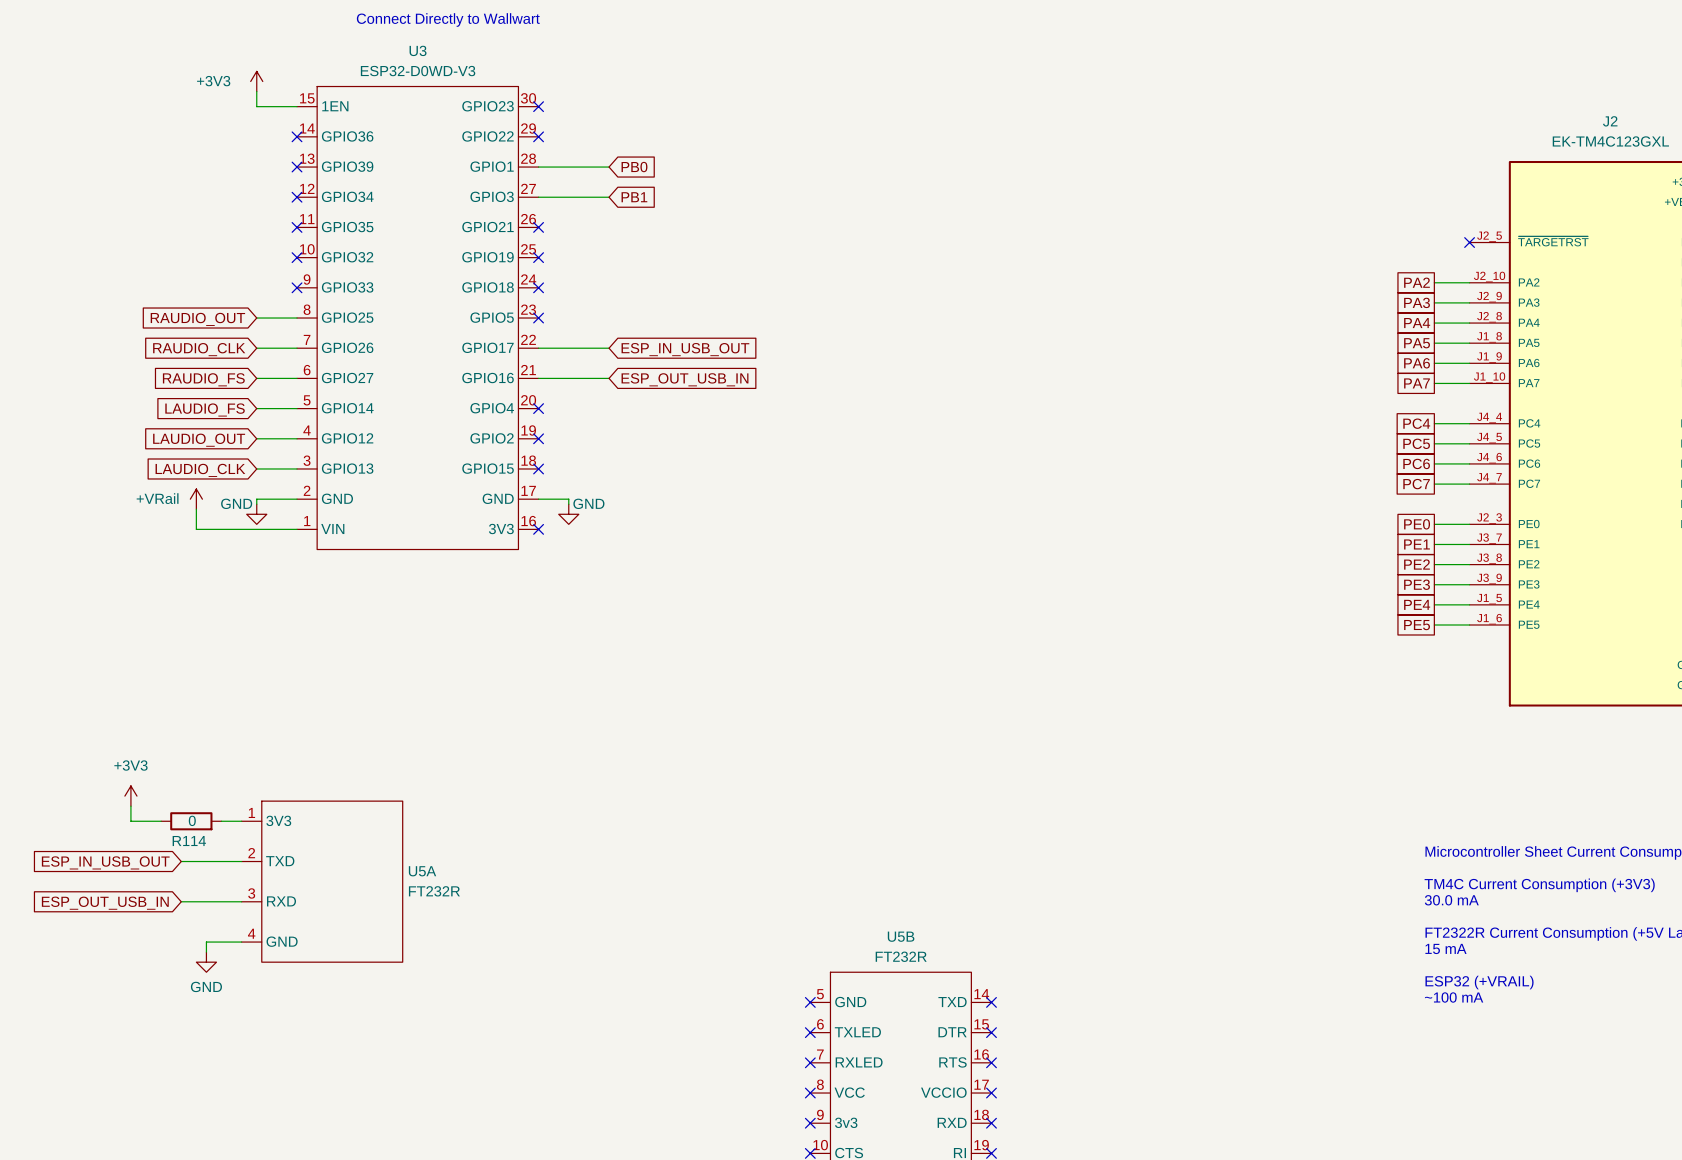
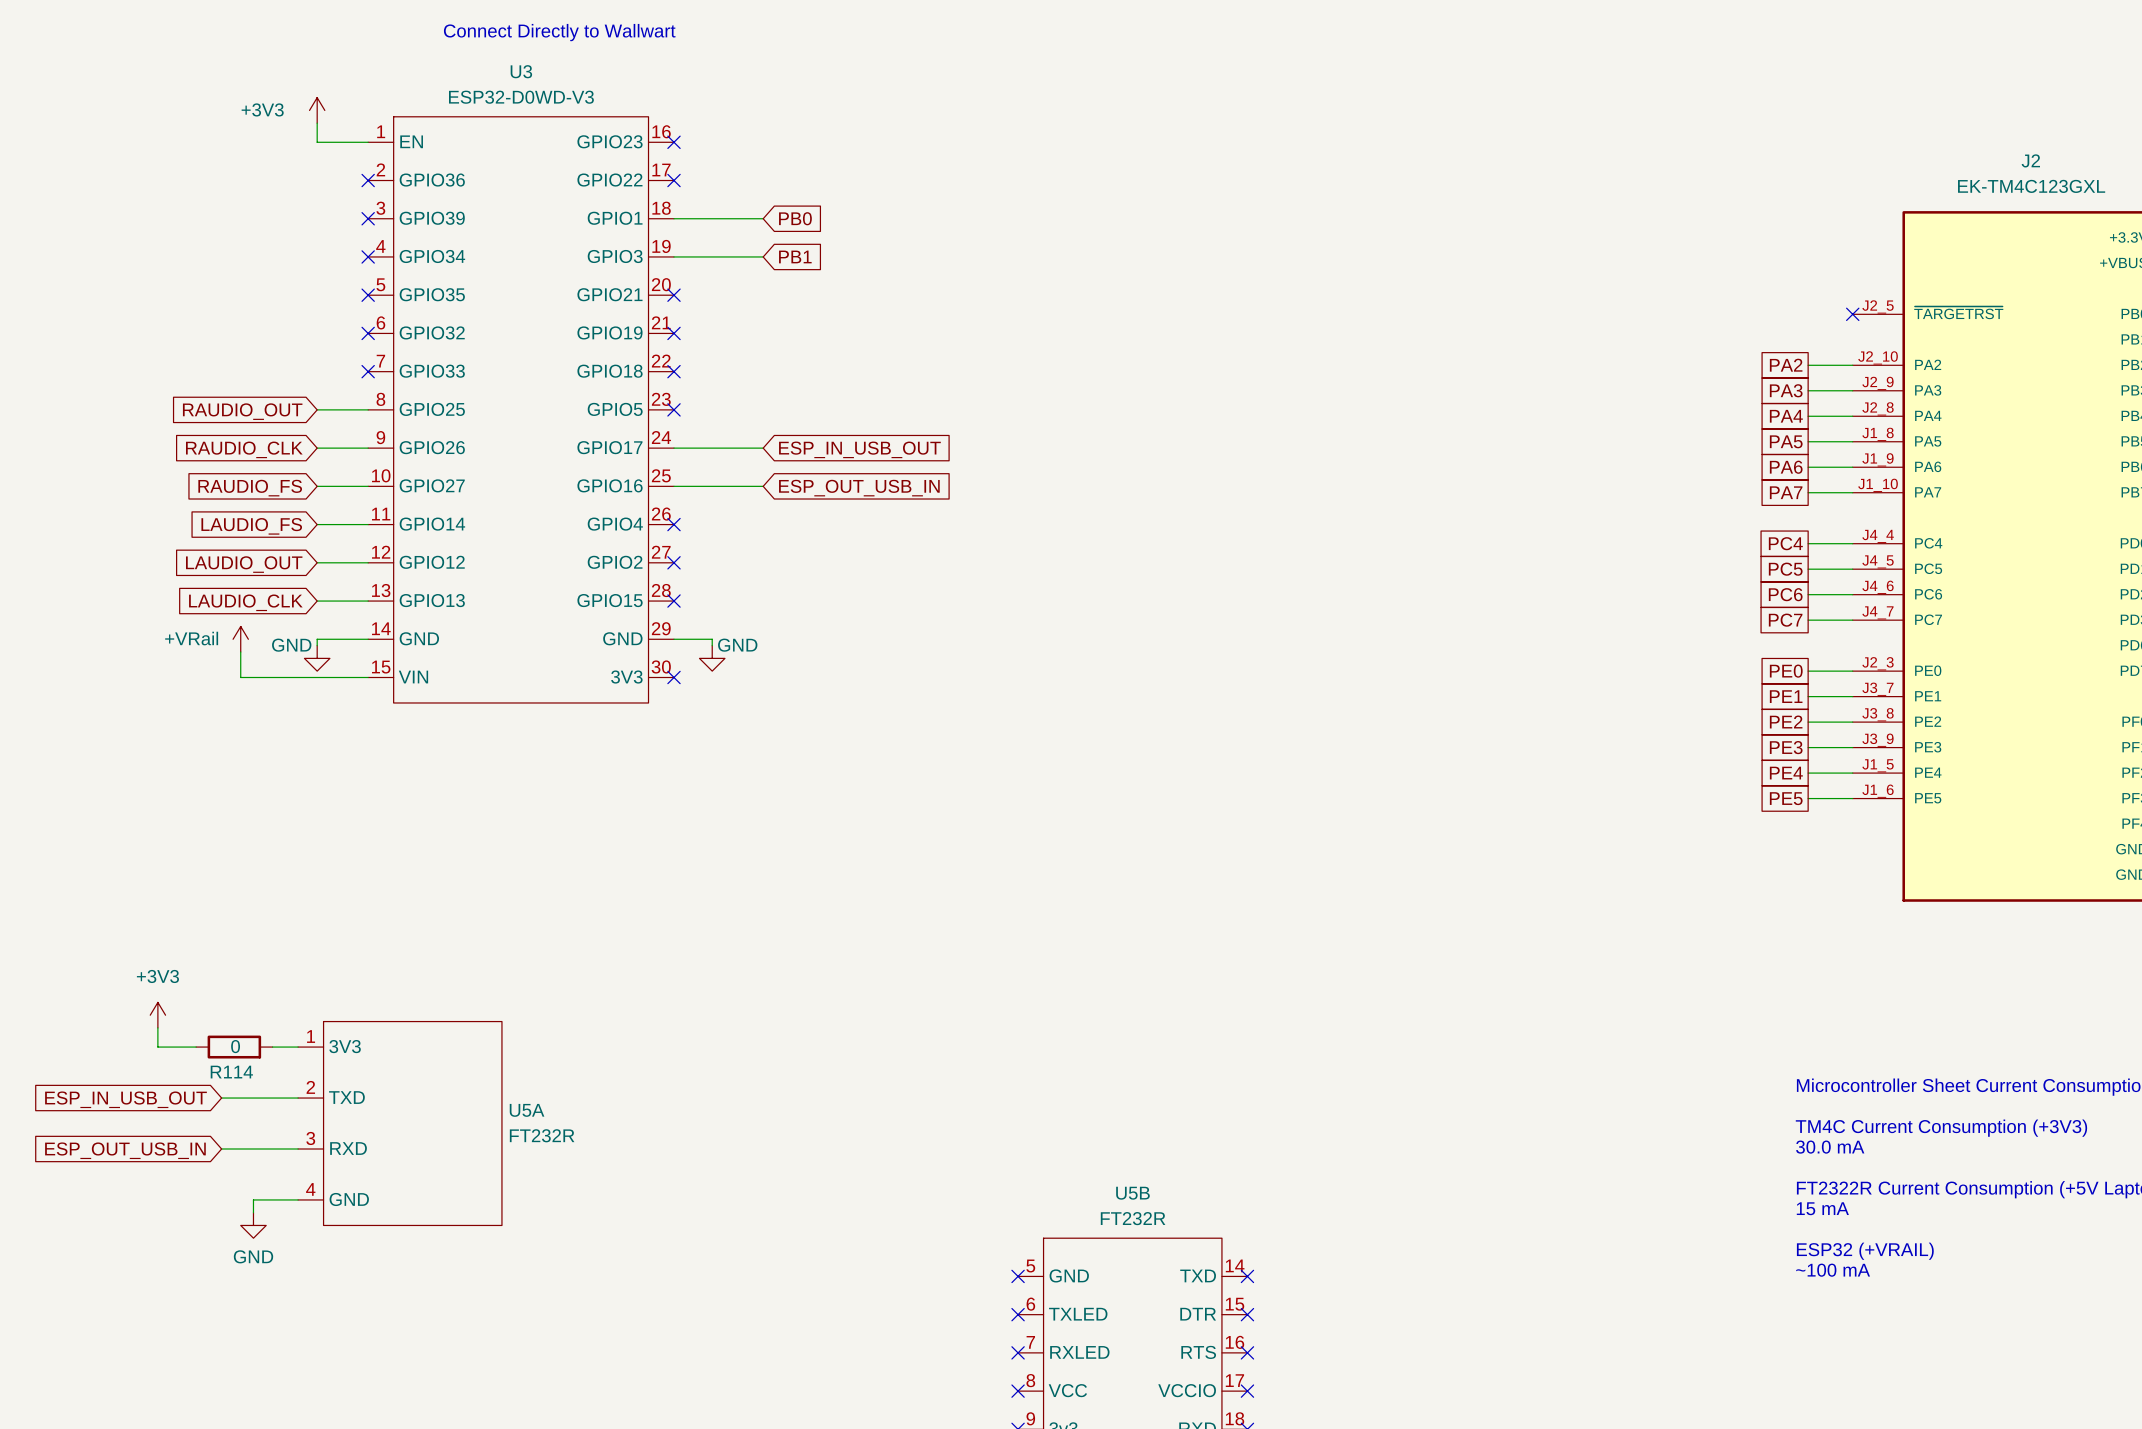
U3 symbol: [297, 86, 539, 550] -> [368, 116, 674, 703]

